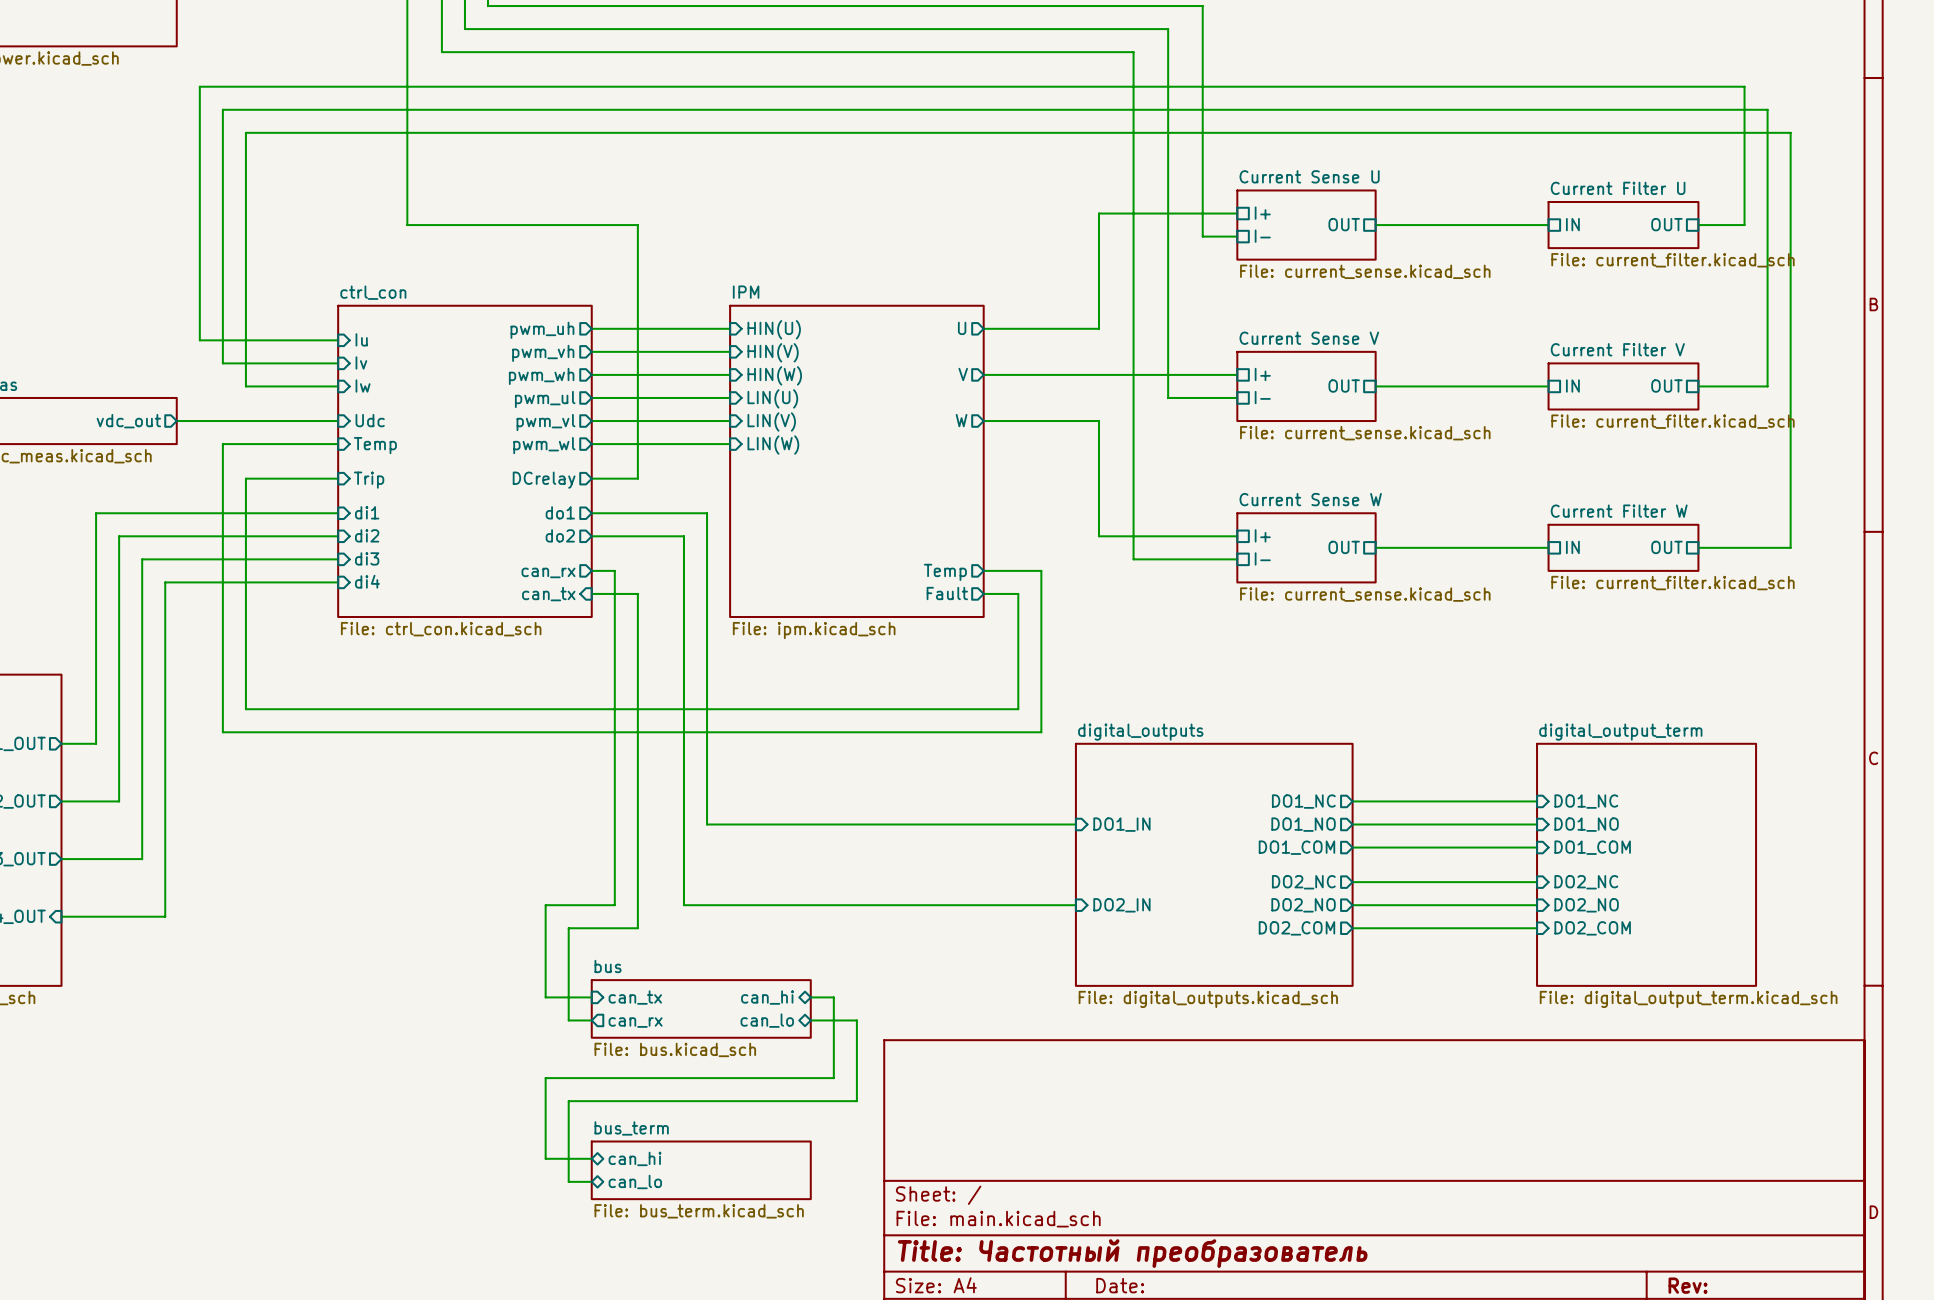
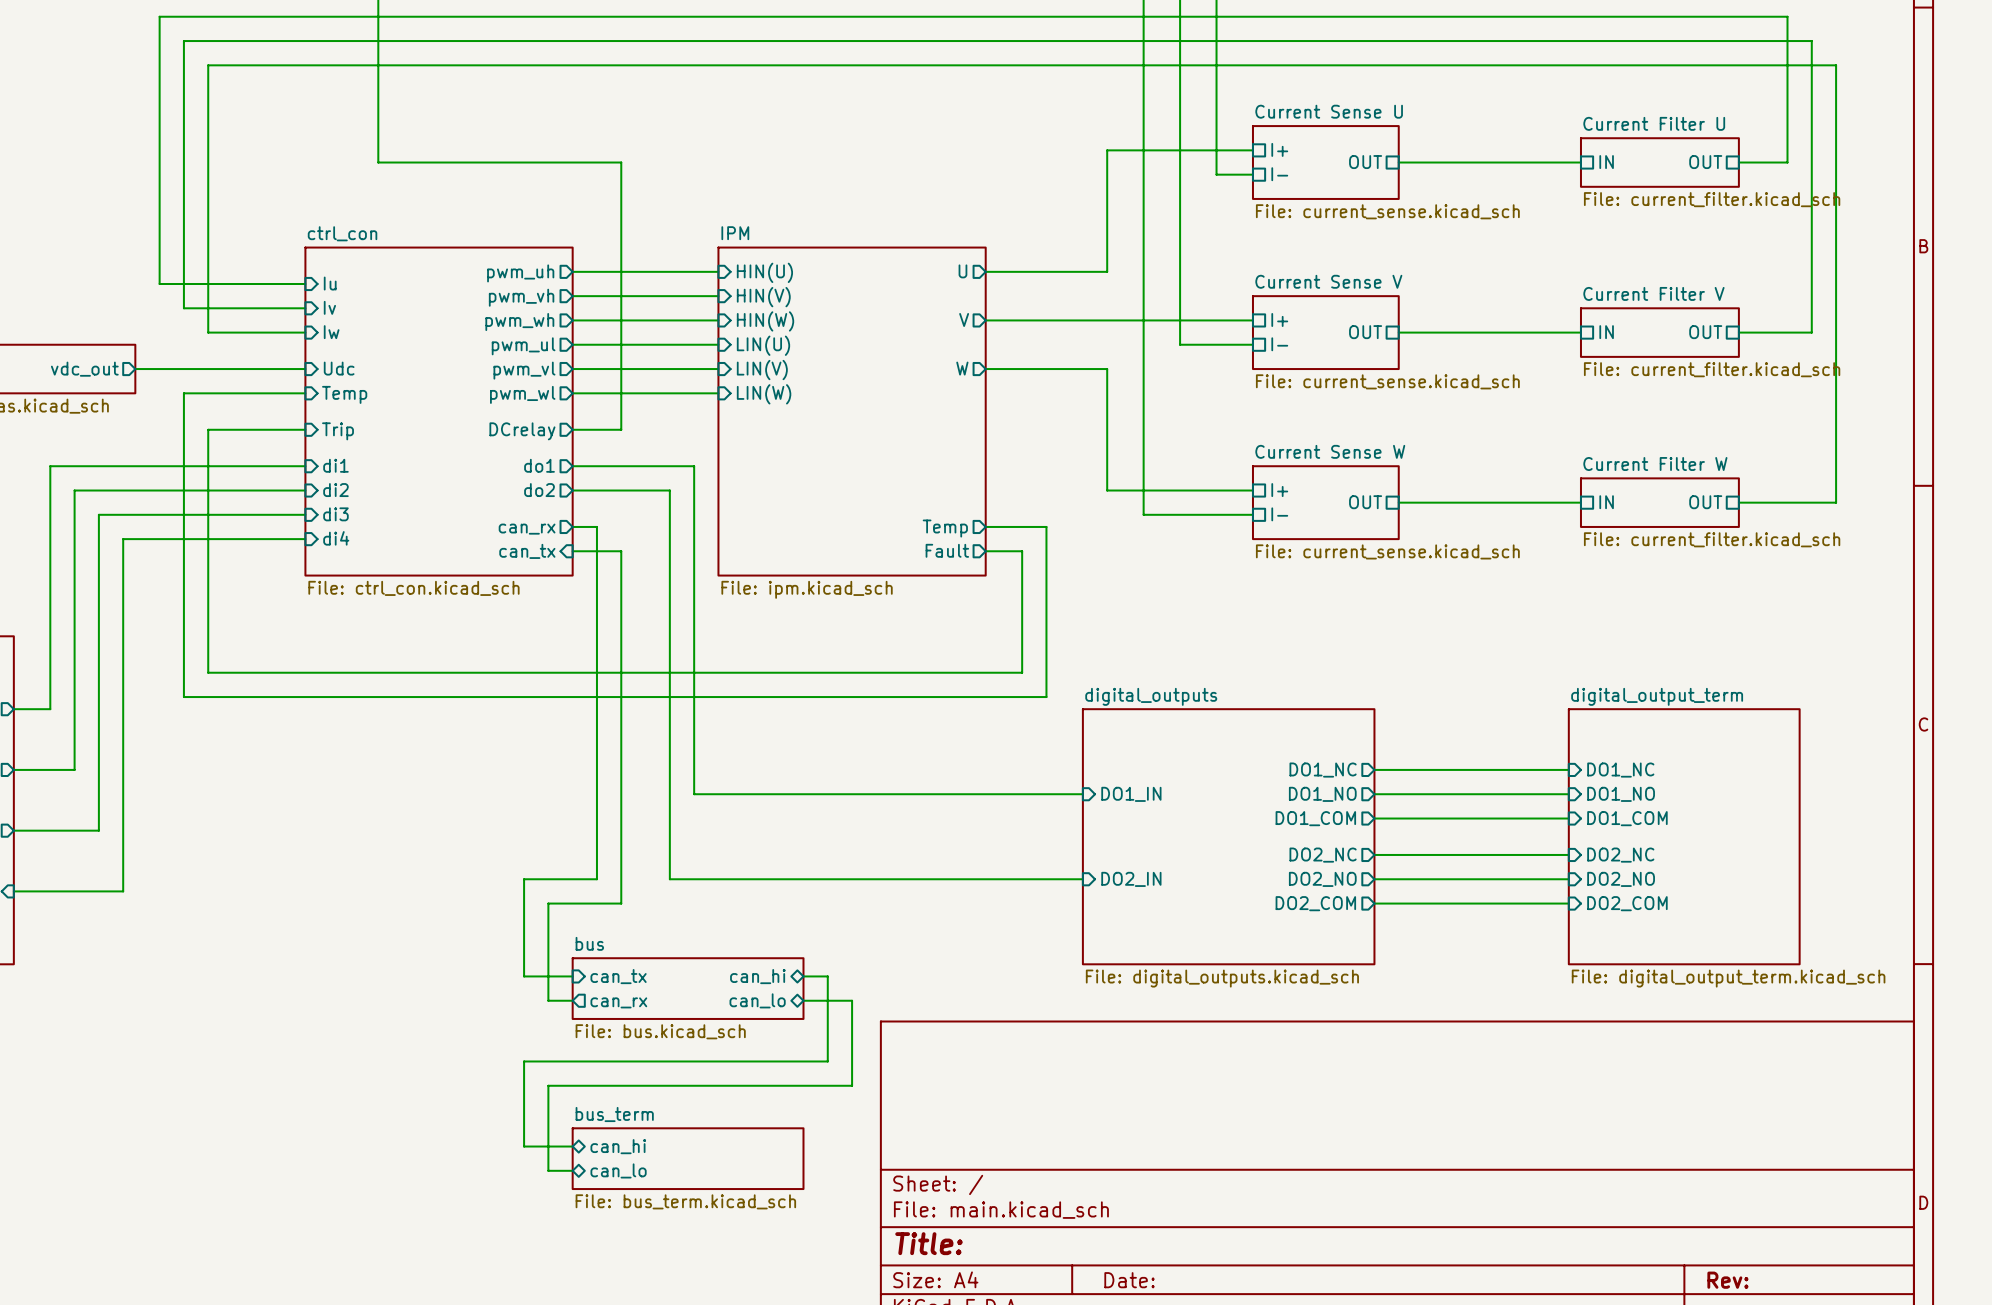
title block: Title: Частотный преобразователь (1132, 1253) -> Title: (929, 1243)

